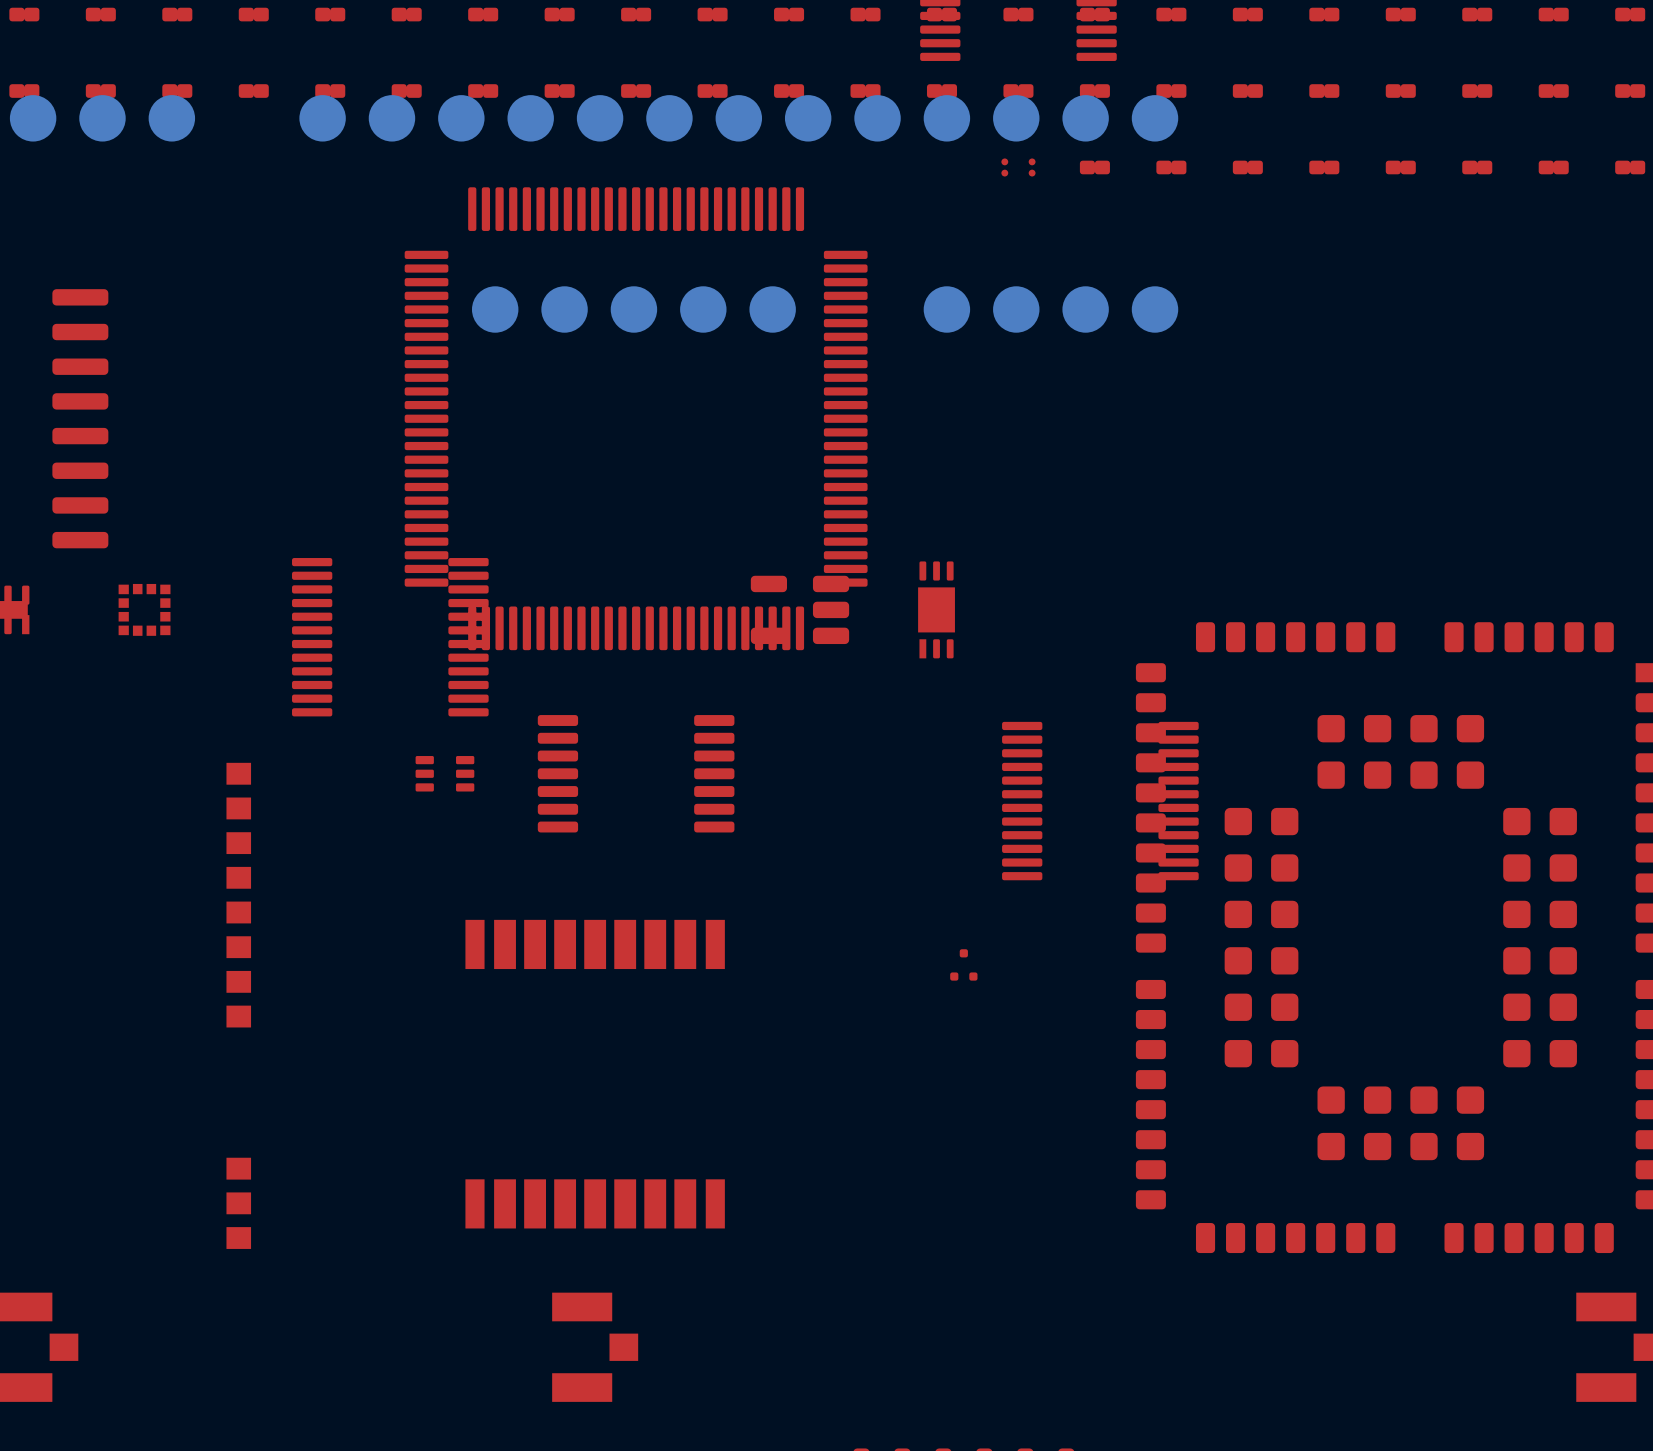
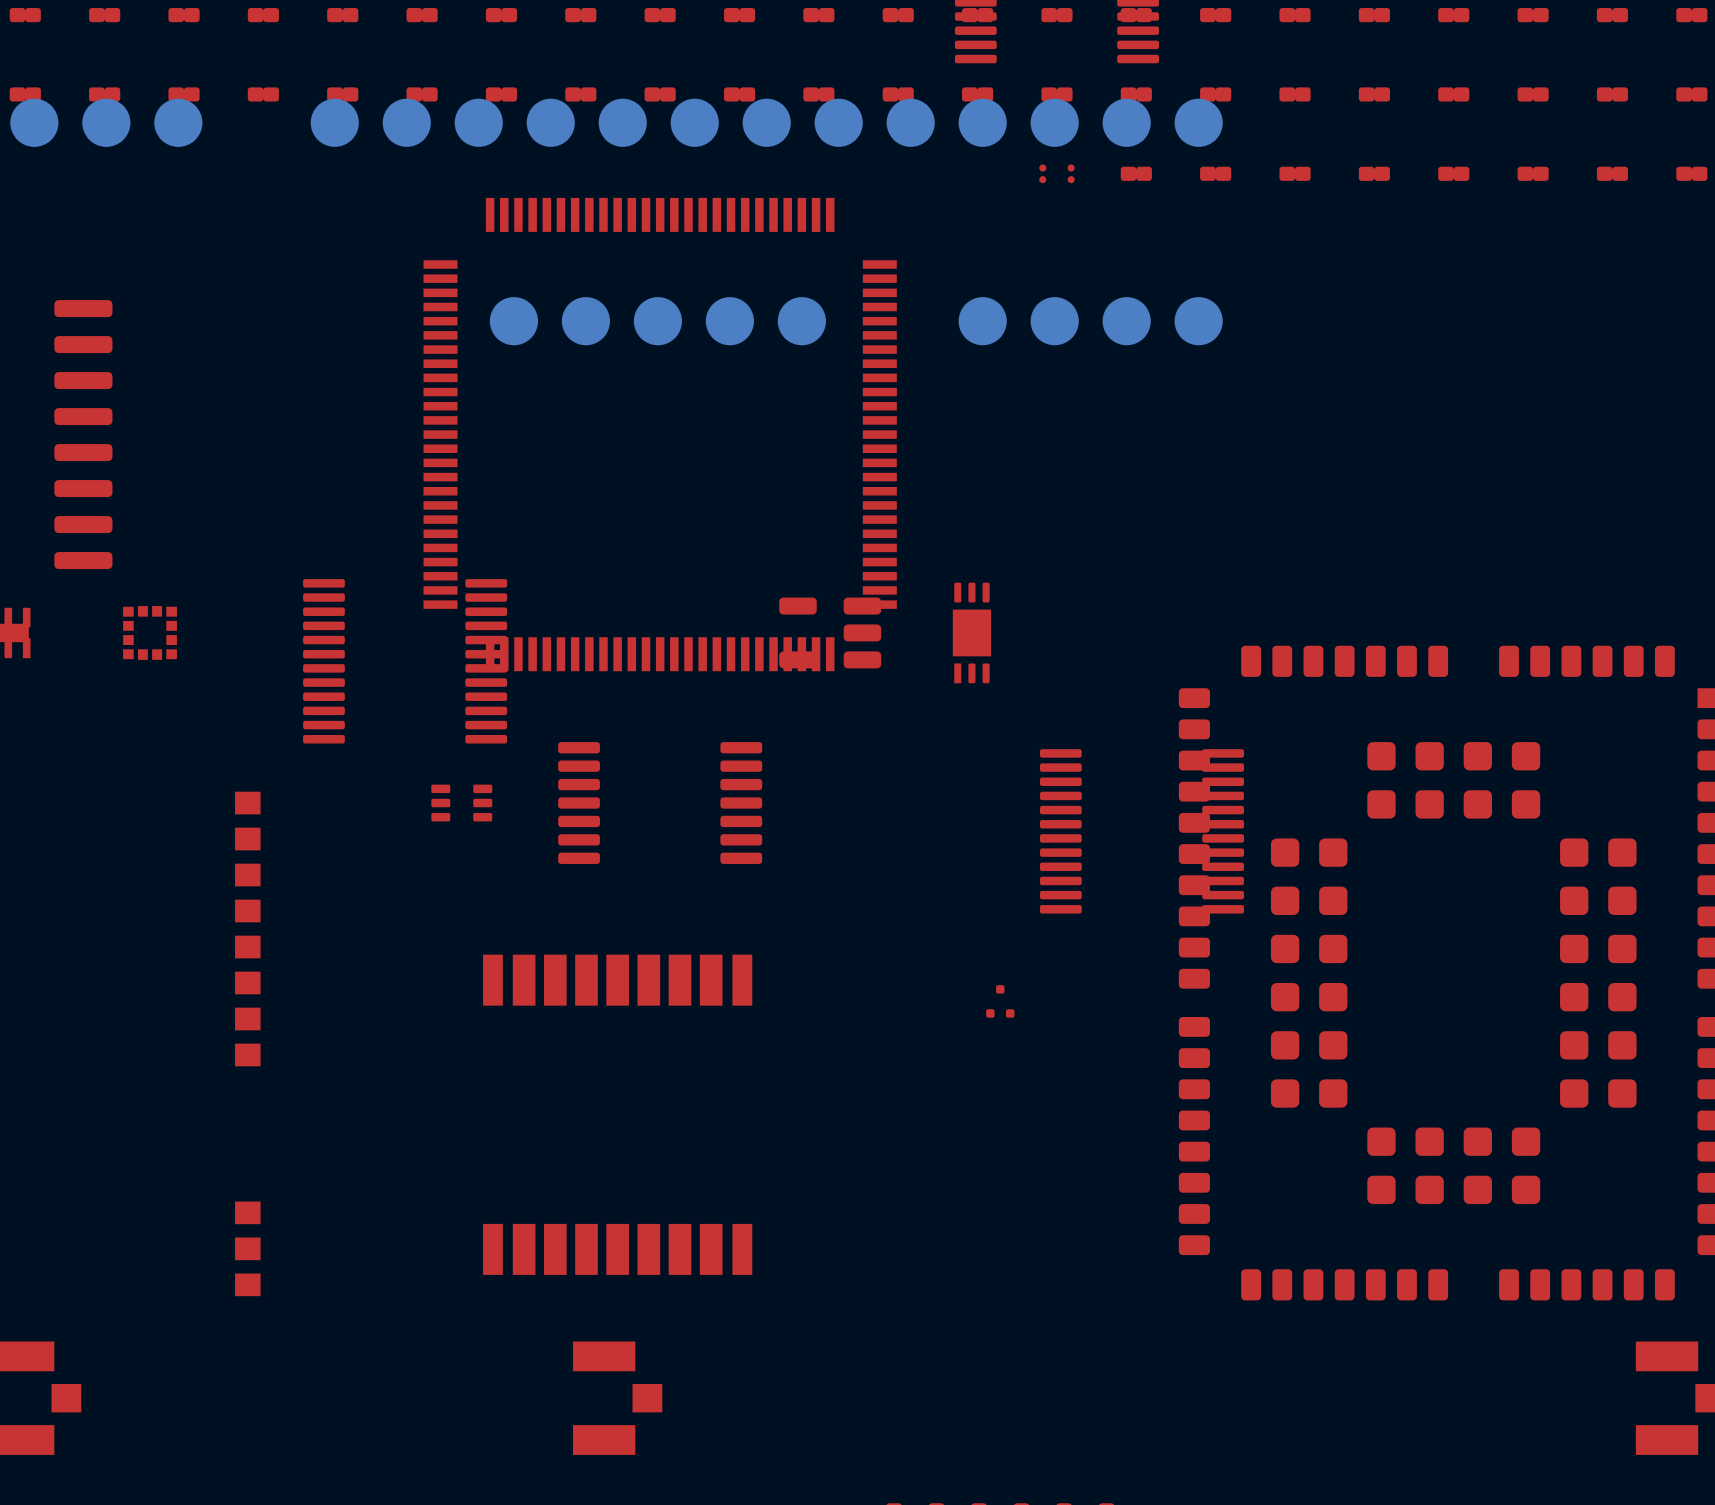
part footprint: [404, 187, 868, 651] -> [423, 197, 897, 672]

